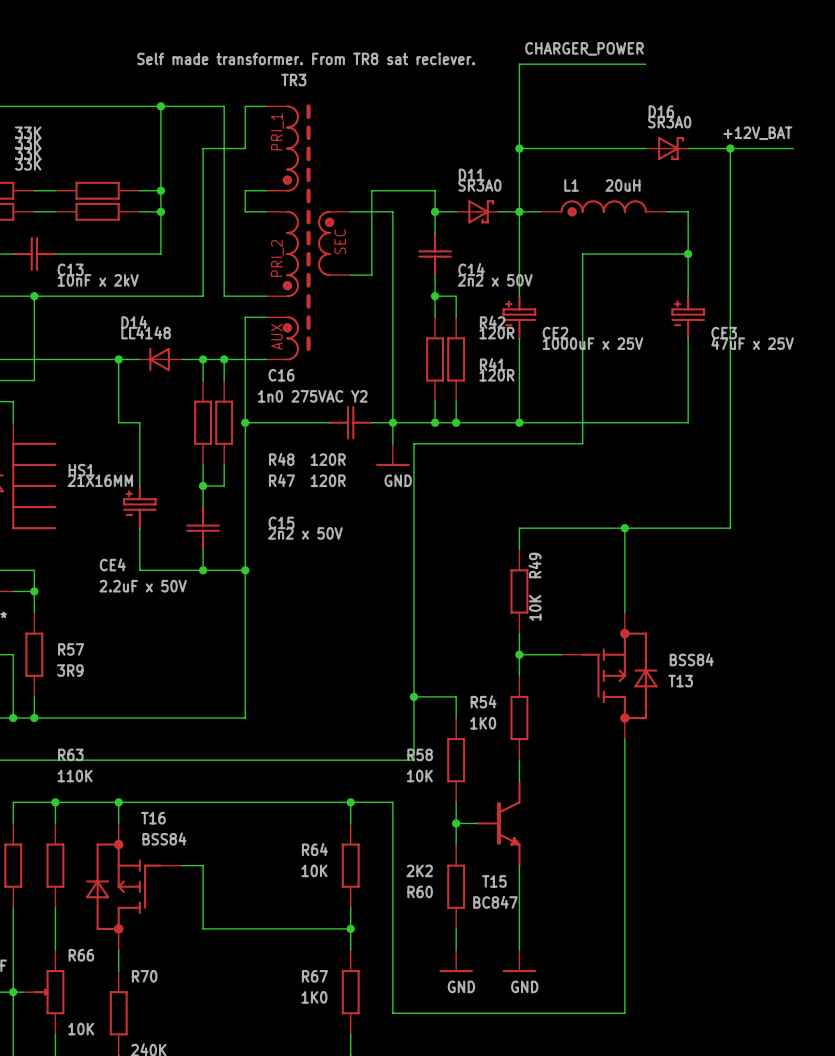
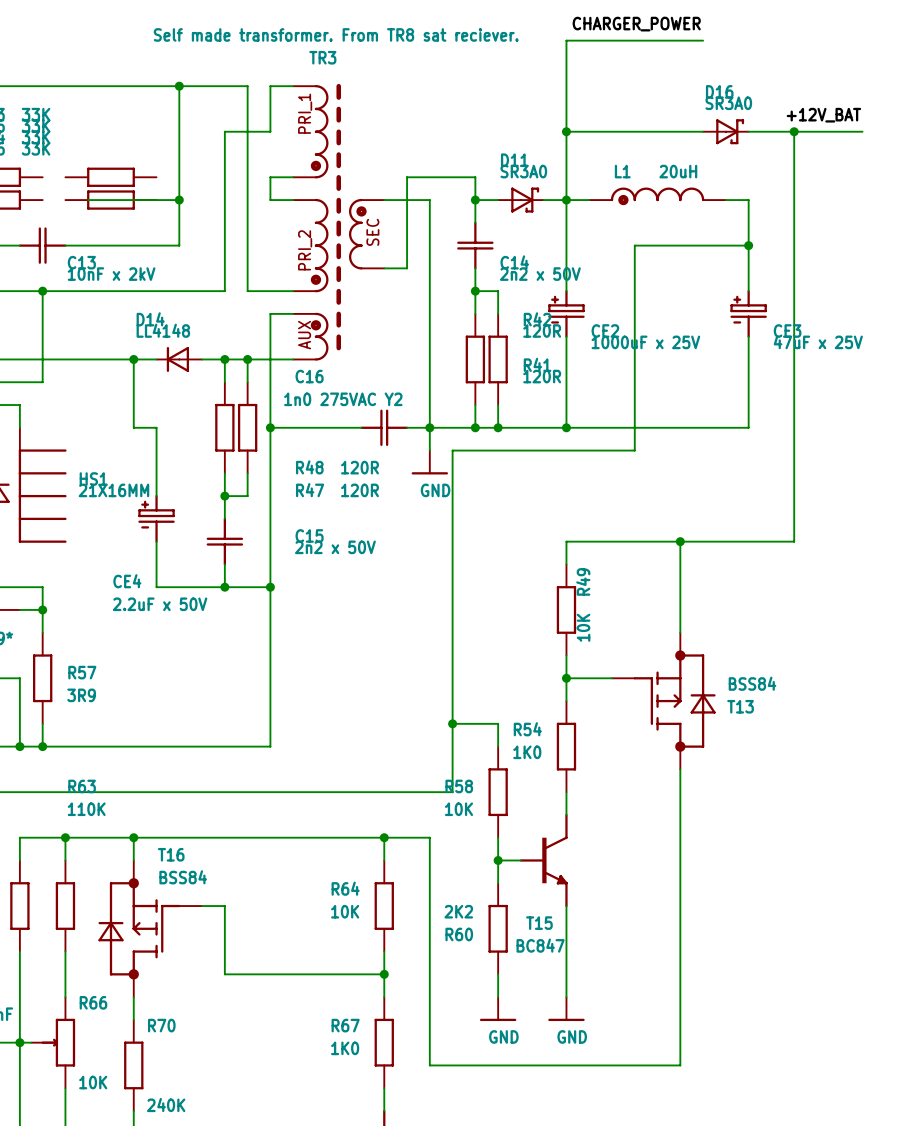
wire: (34, 190) (55, 190) -> none
wire: (139, 190) (160, 190) -> none
junction: (160, 190) -> none
wire: (34, 211) (55, 211) -> none
wire: none -> (88, 200) (156, 200)

